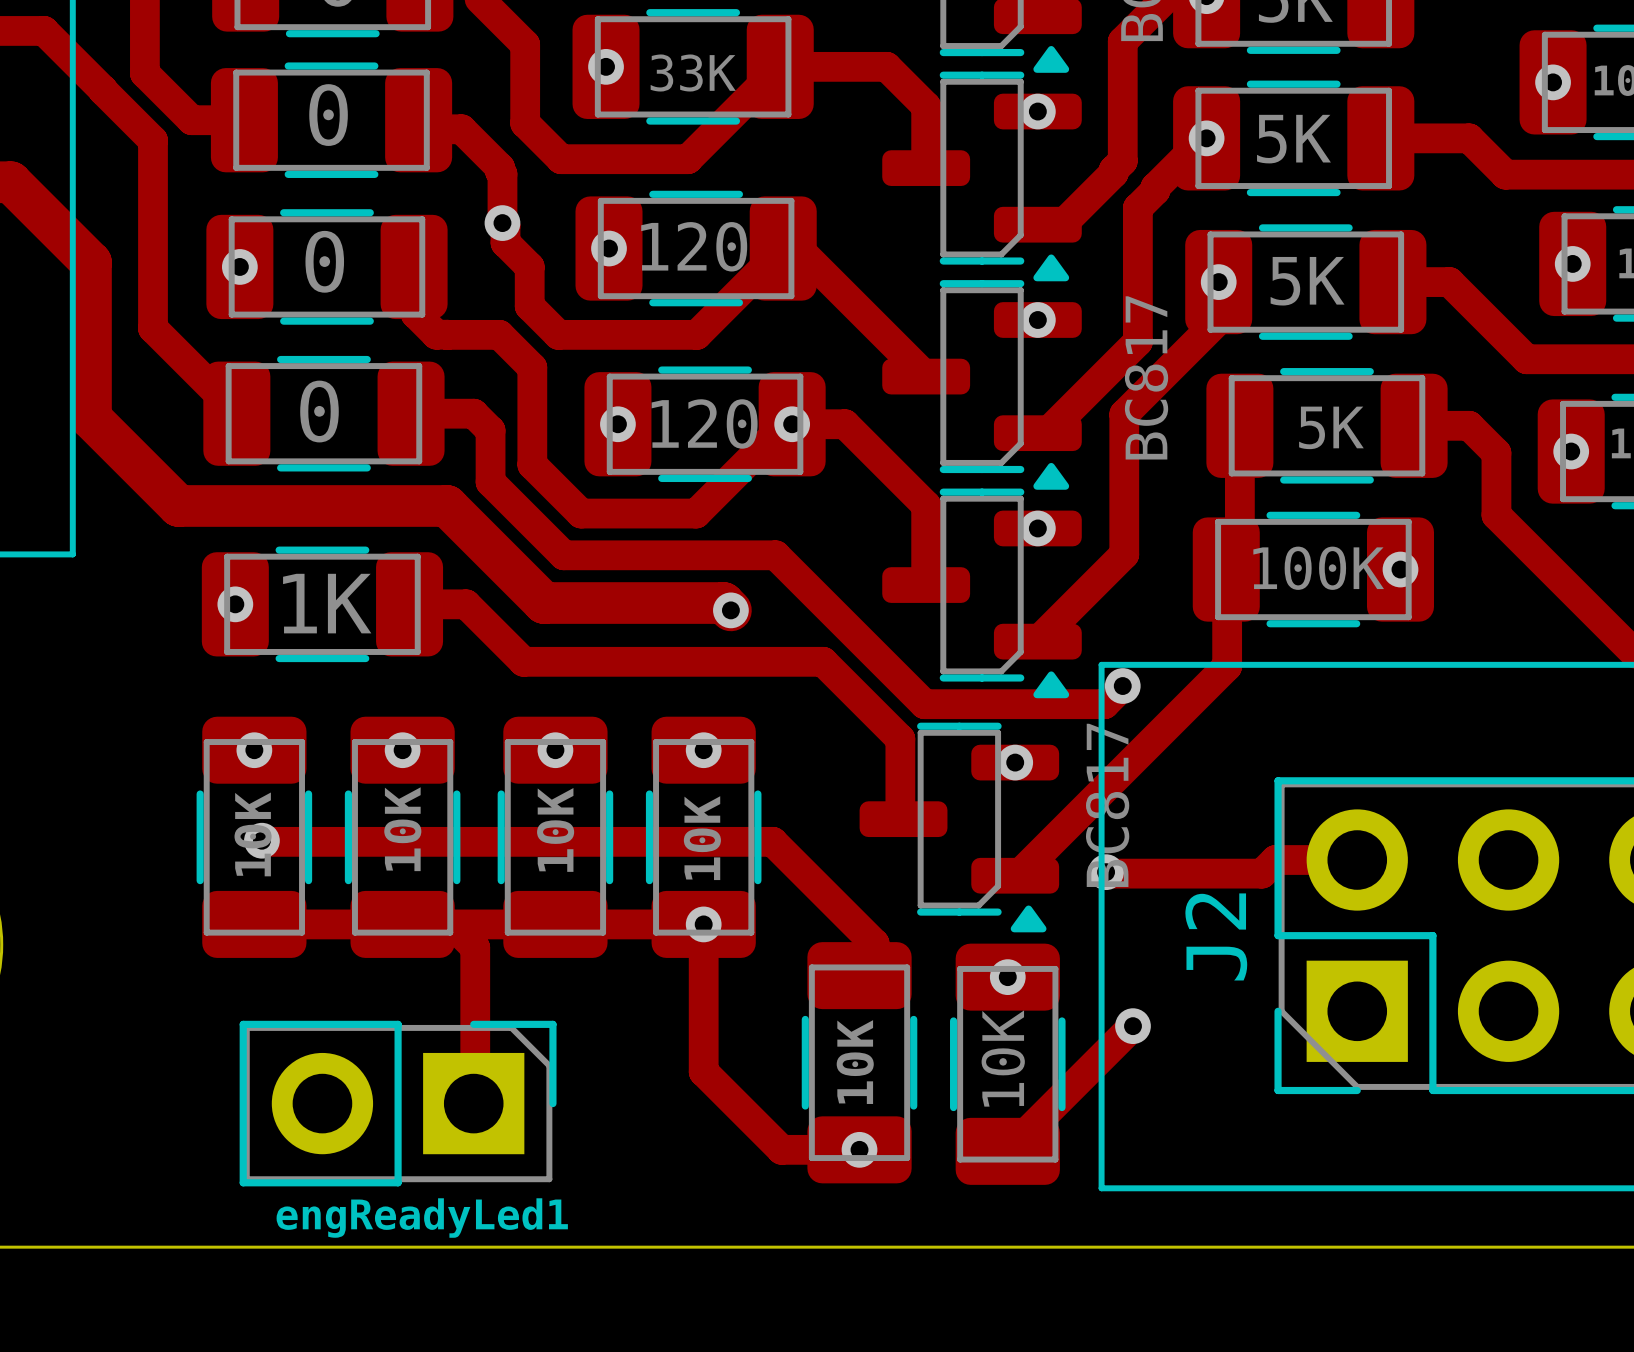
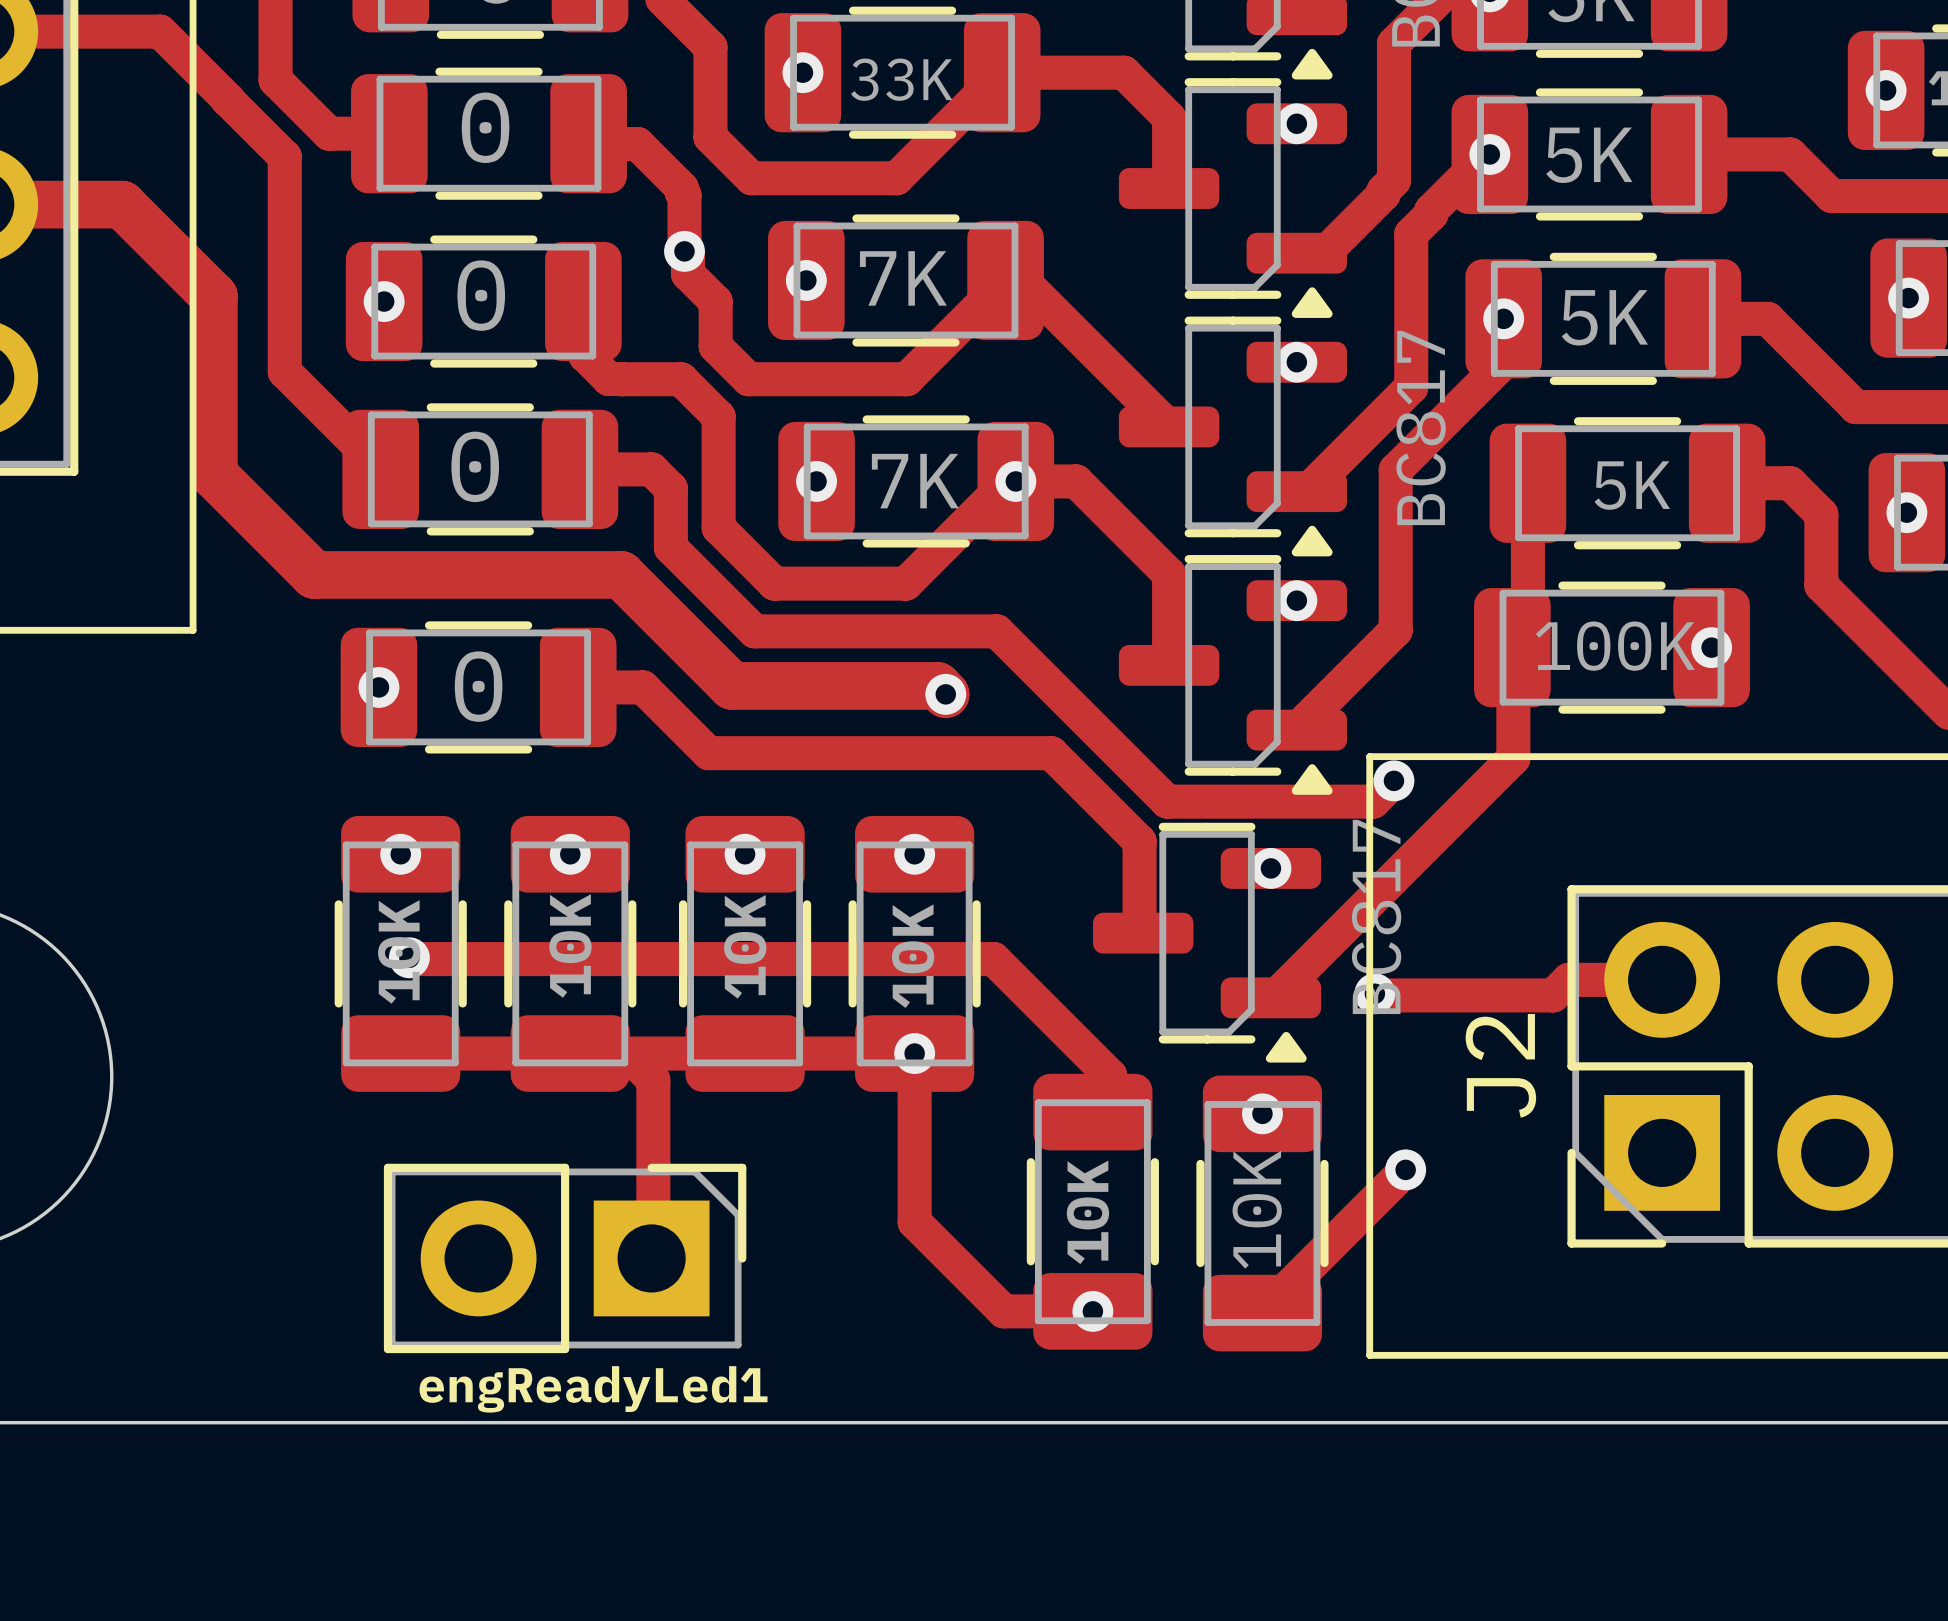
part value: 120 (694, 246) -> 7K (903, 278)
part value: 120 (704, 423) -> 7K (915, 481)
part value: 1K (327, 603) -> 0 (478, 686)

